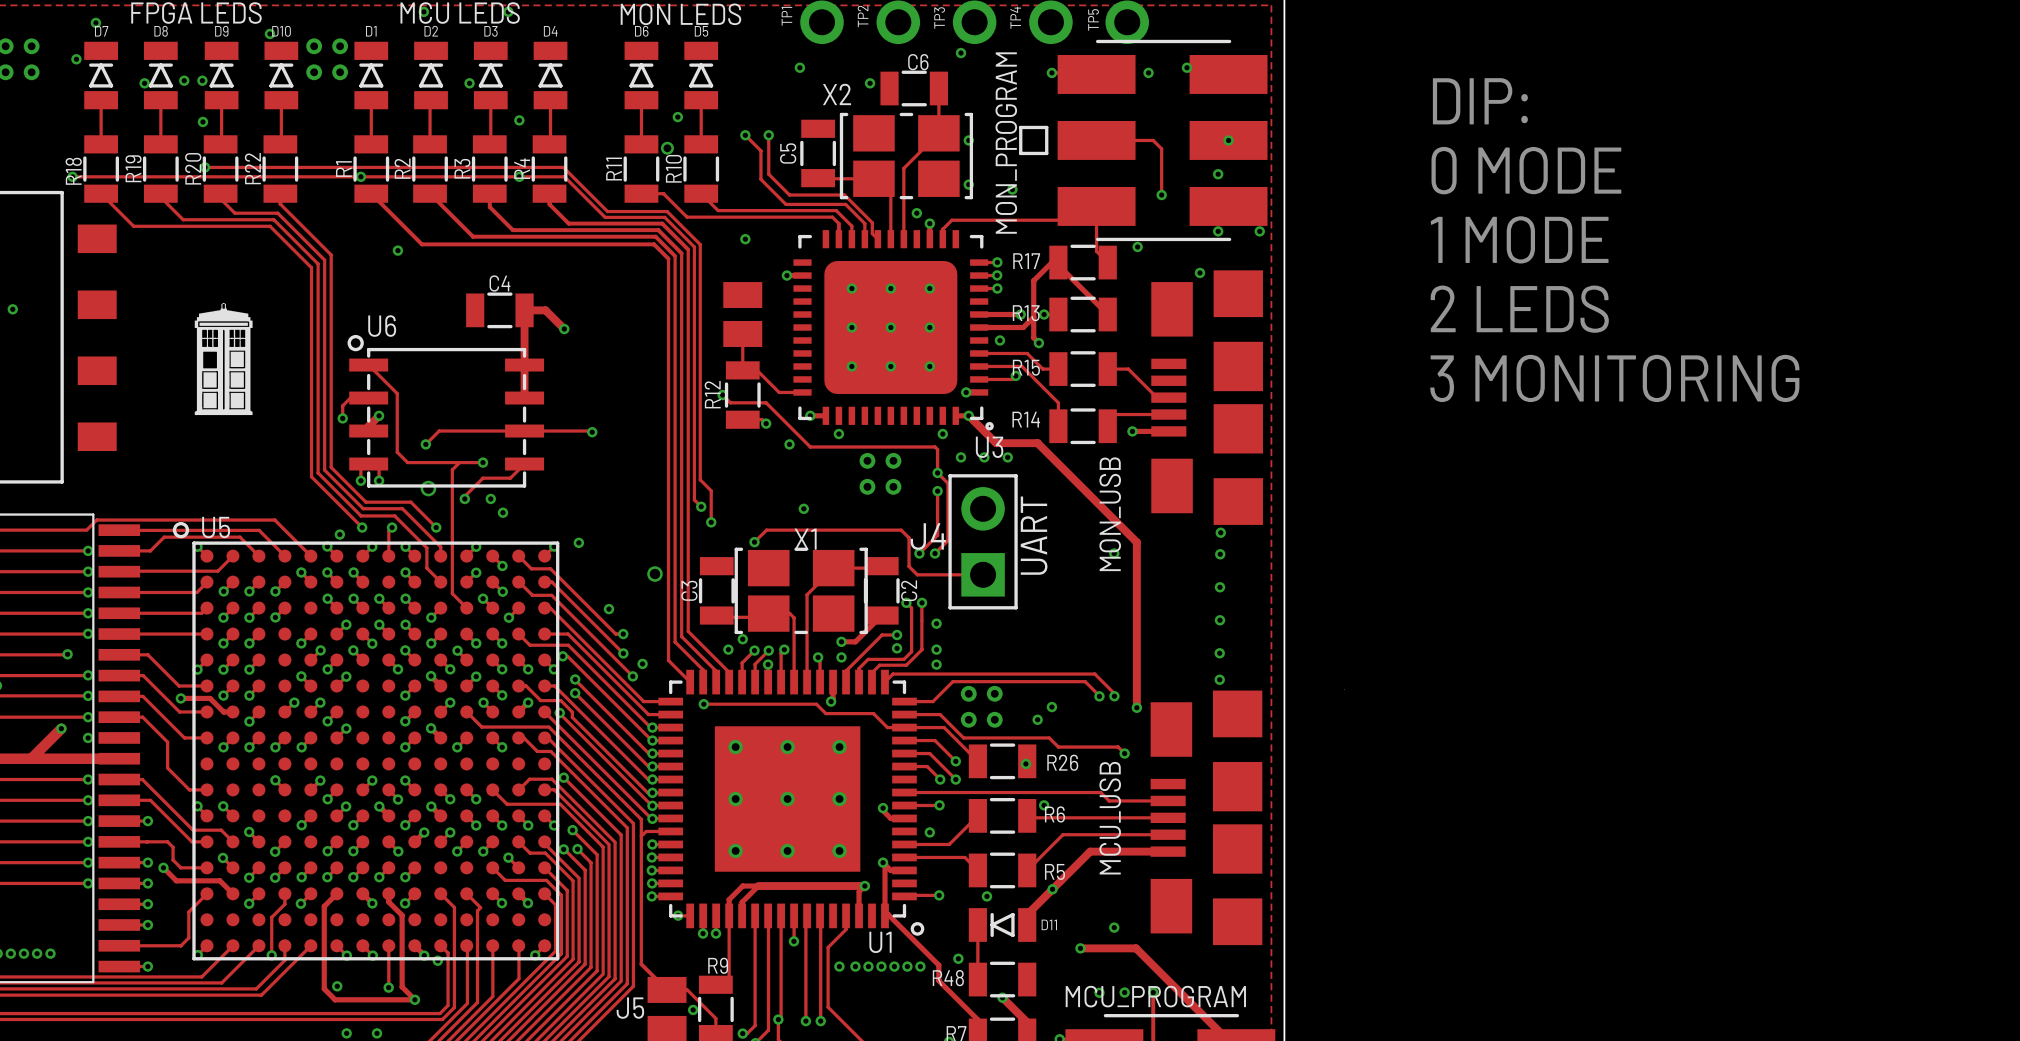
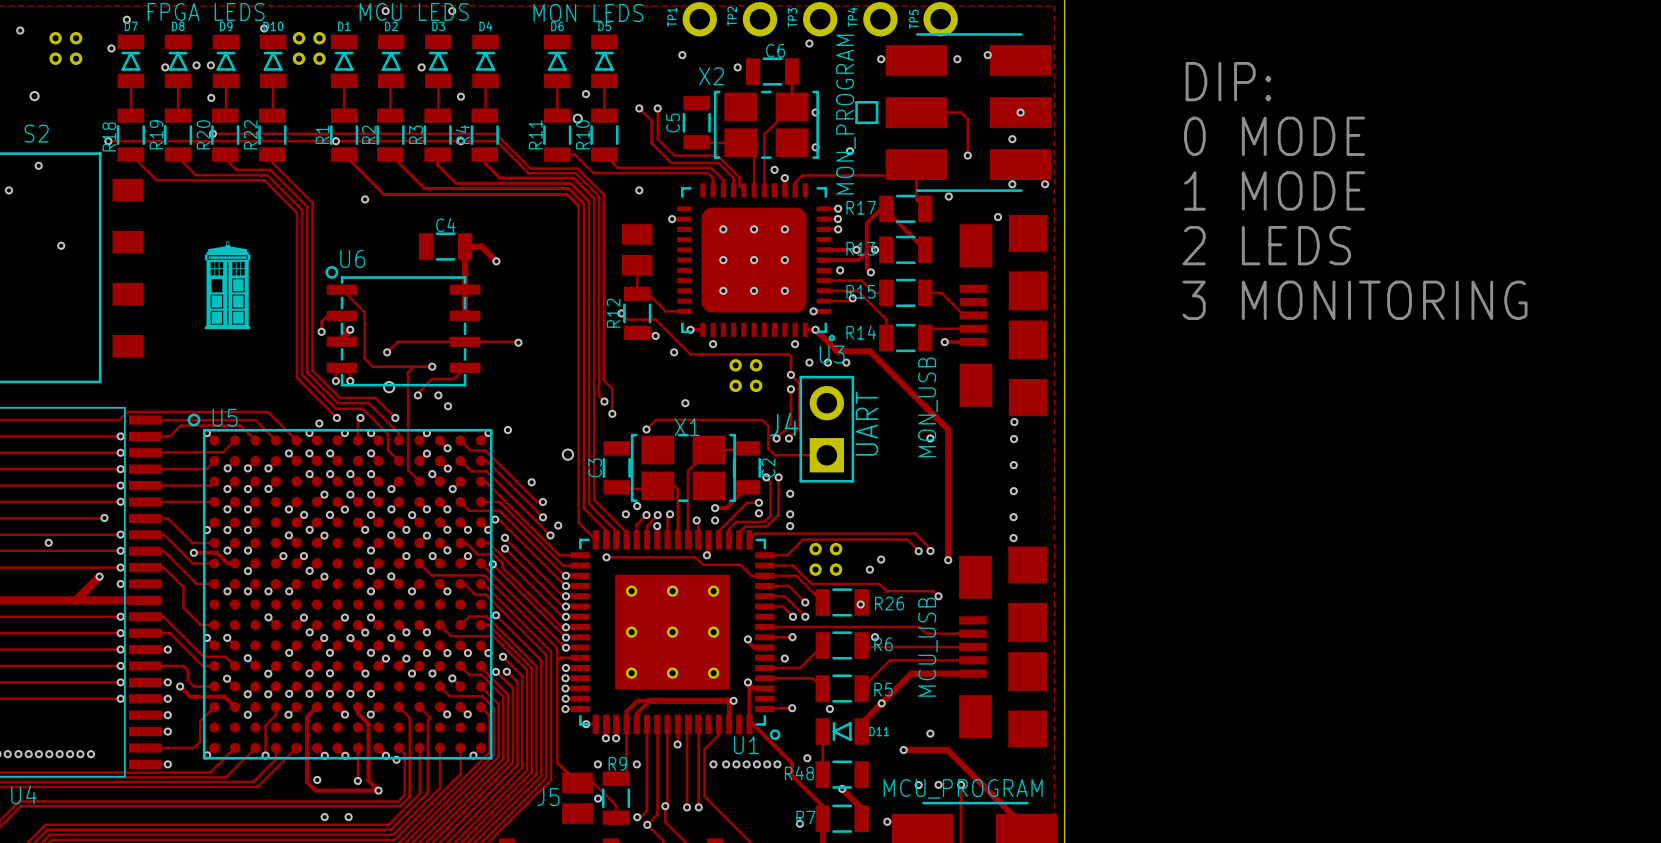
via: none -> (597, 764)
via: none -> (636, 764)

